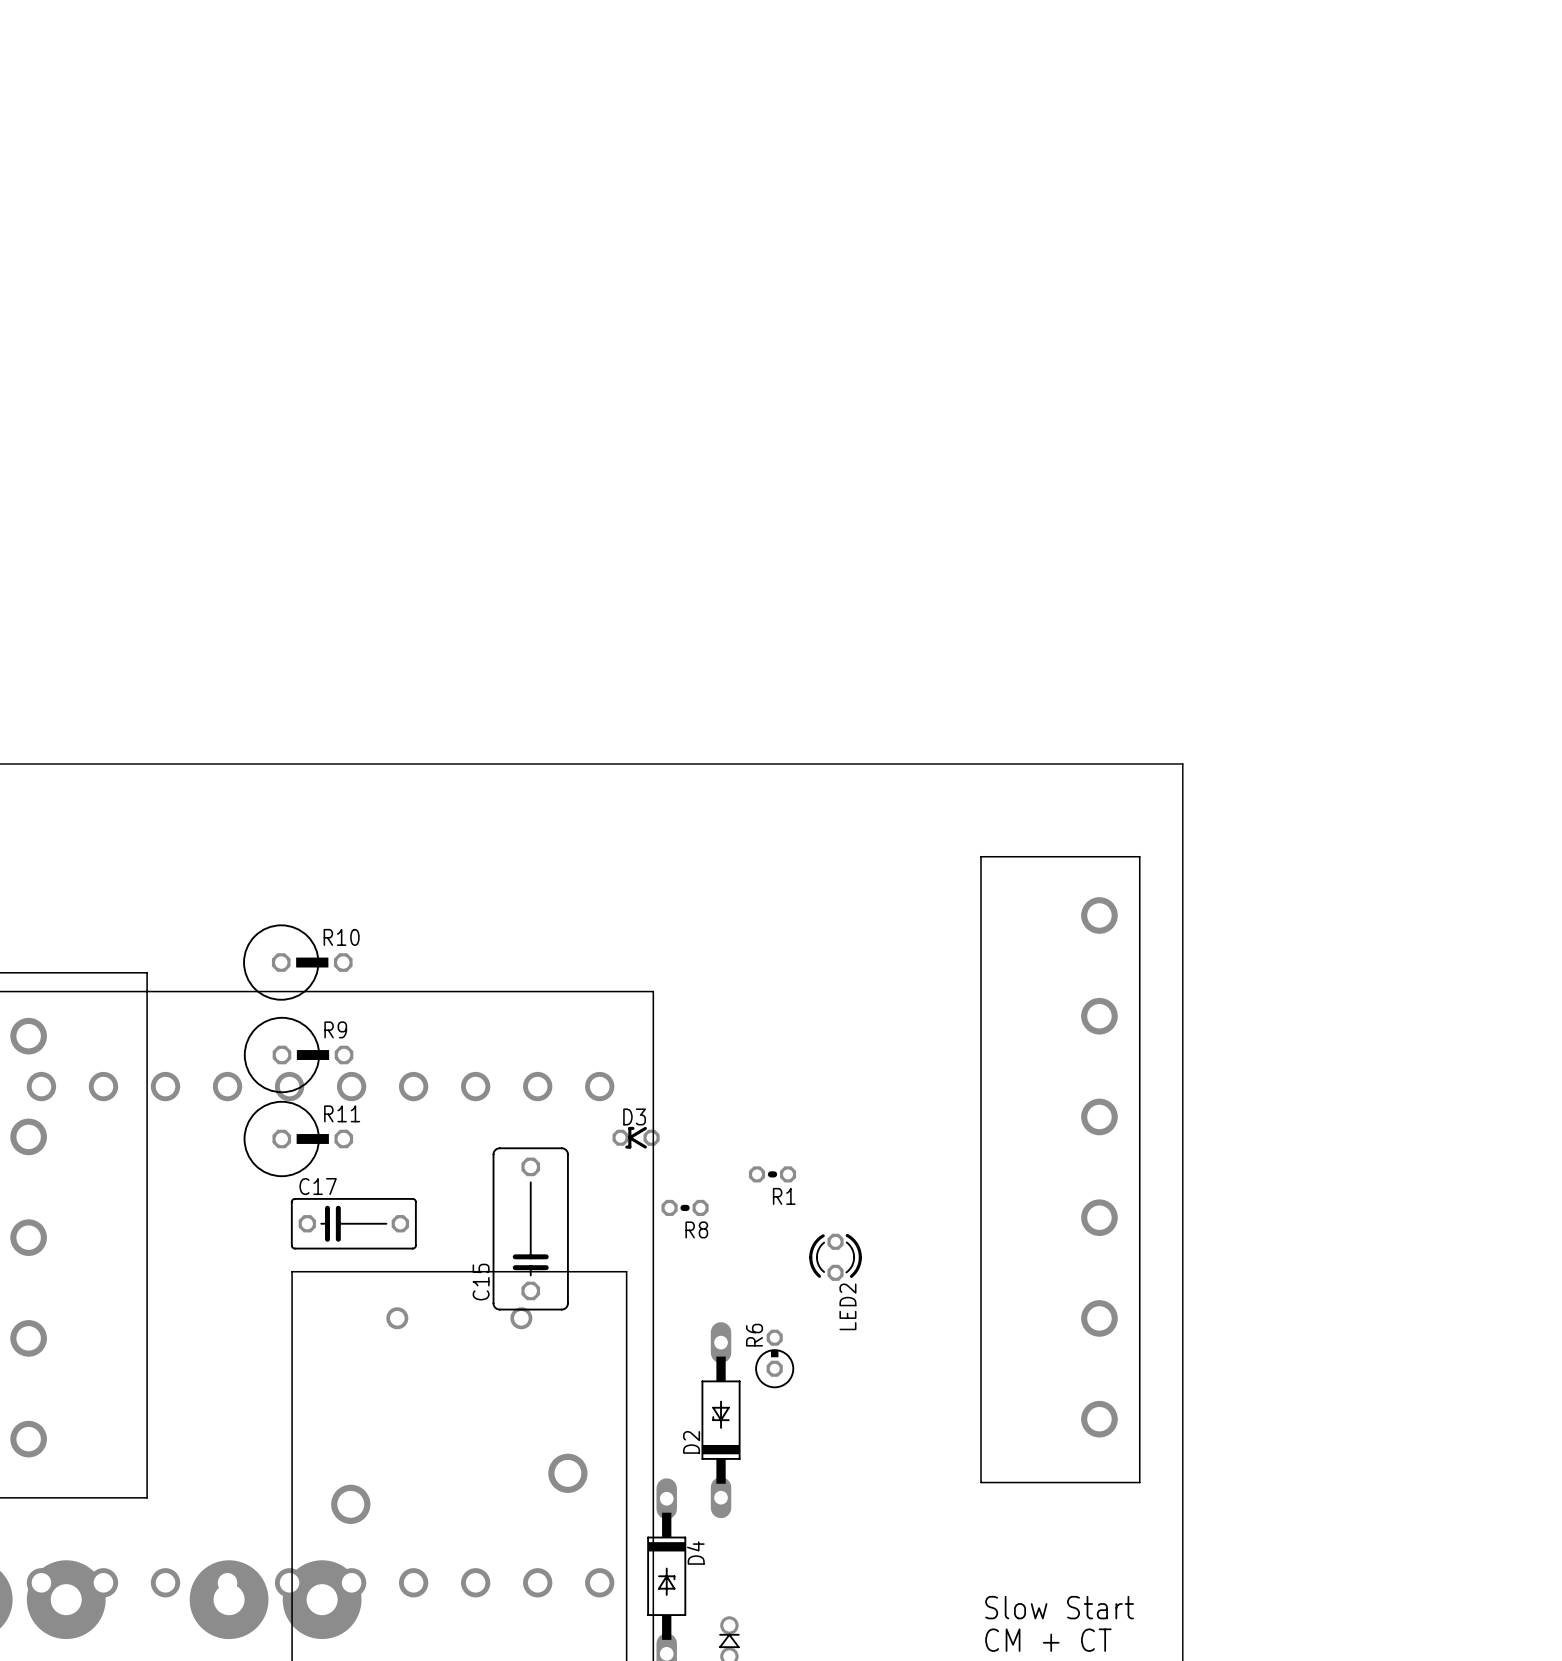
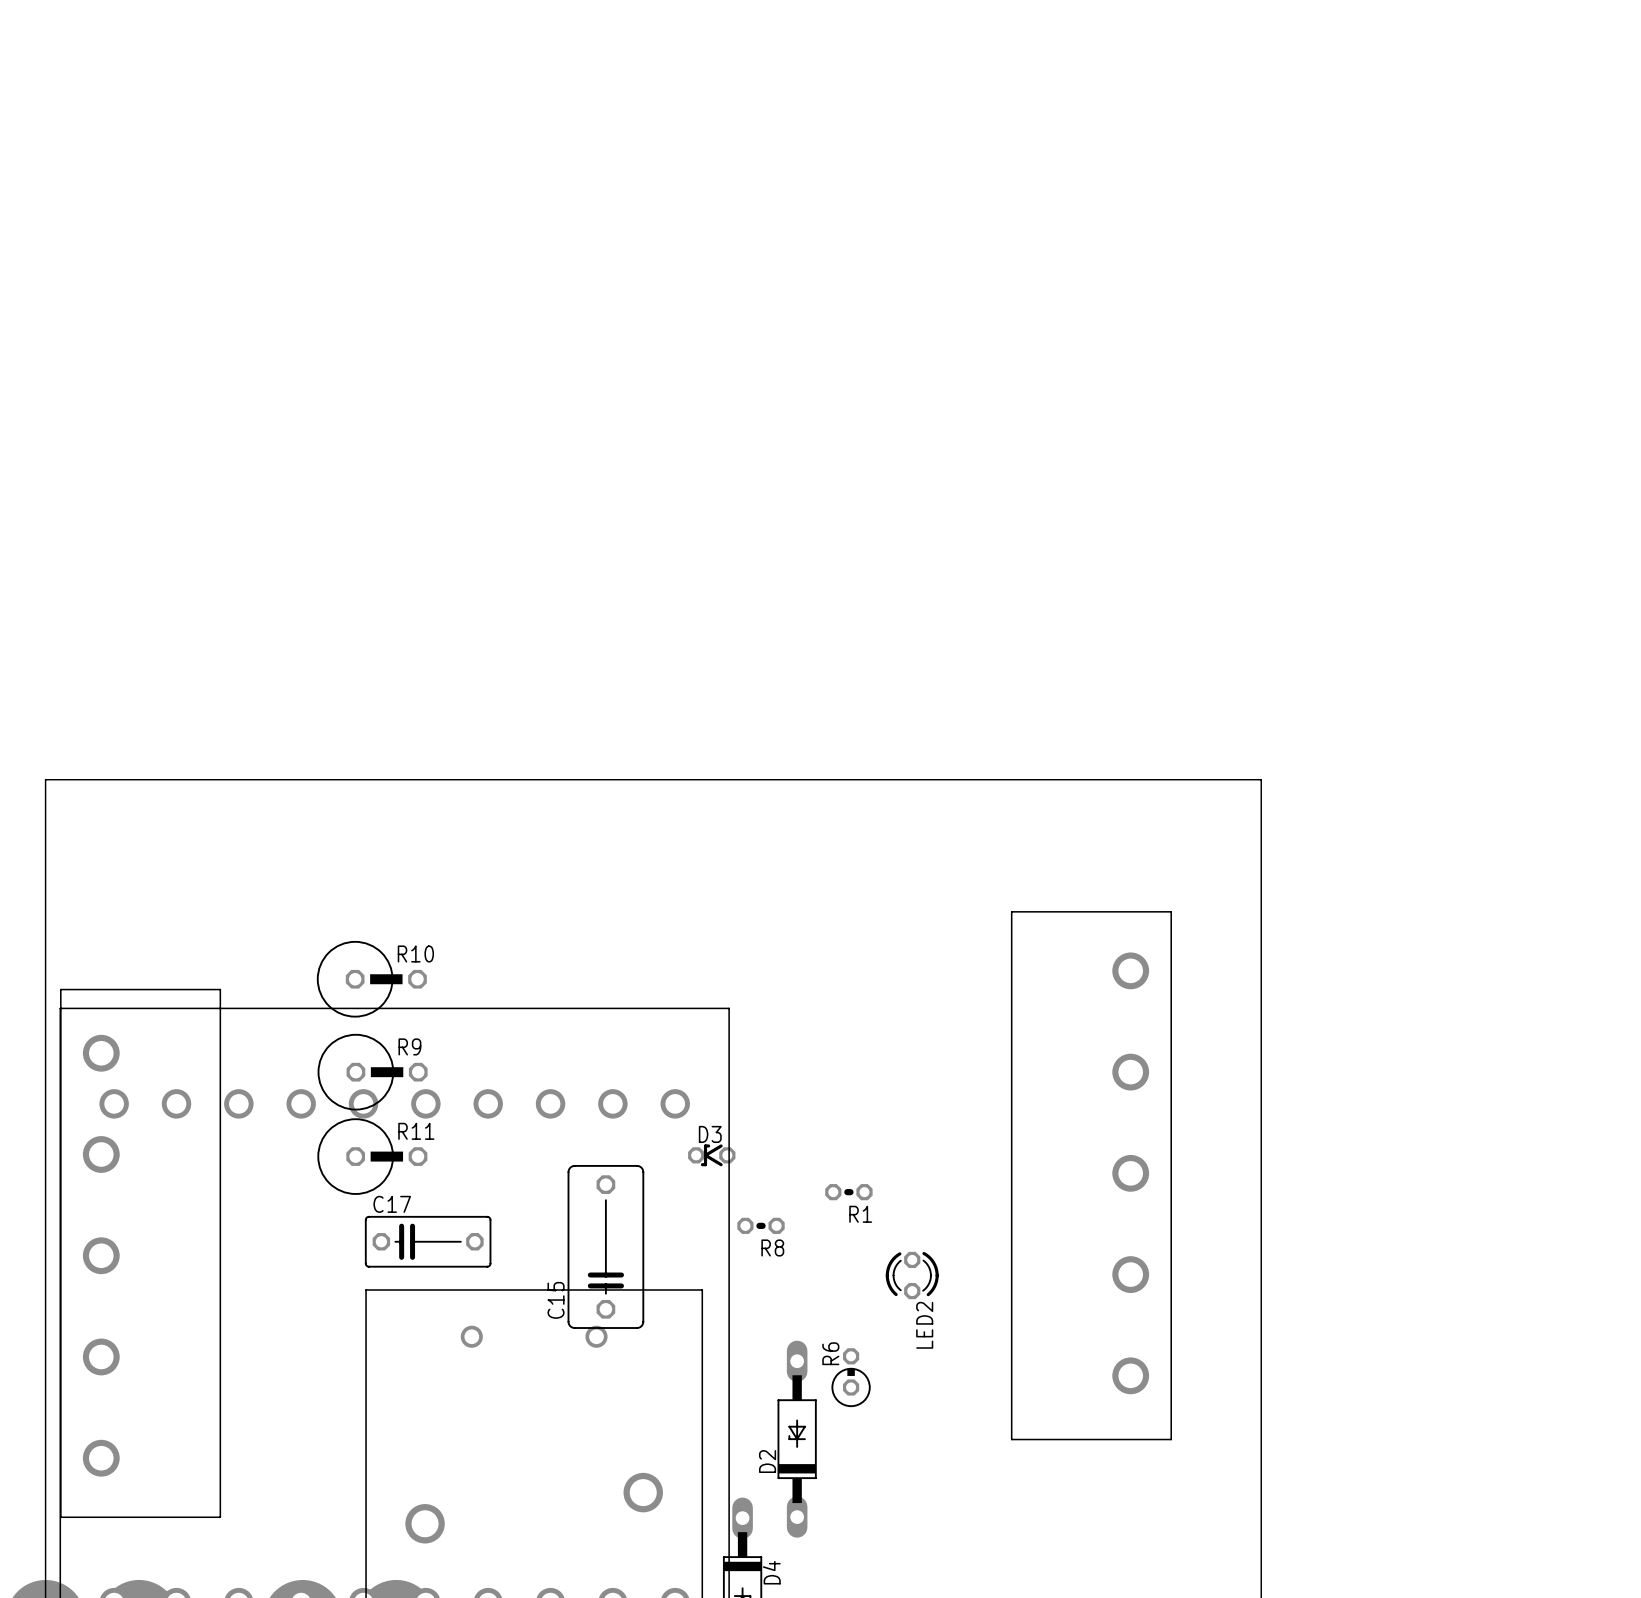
part: none -> (1091, 1175)
part: (1060, 1169) -> none

